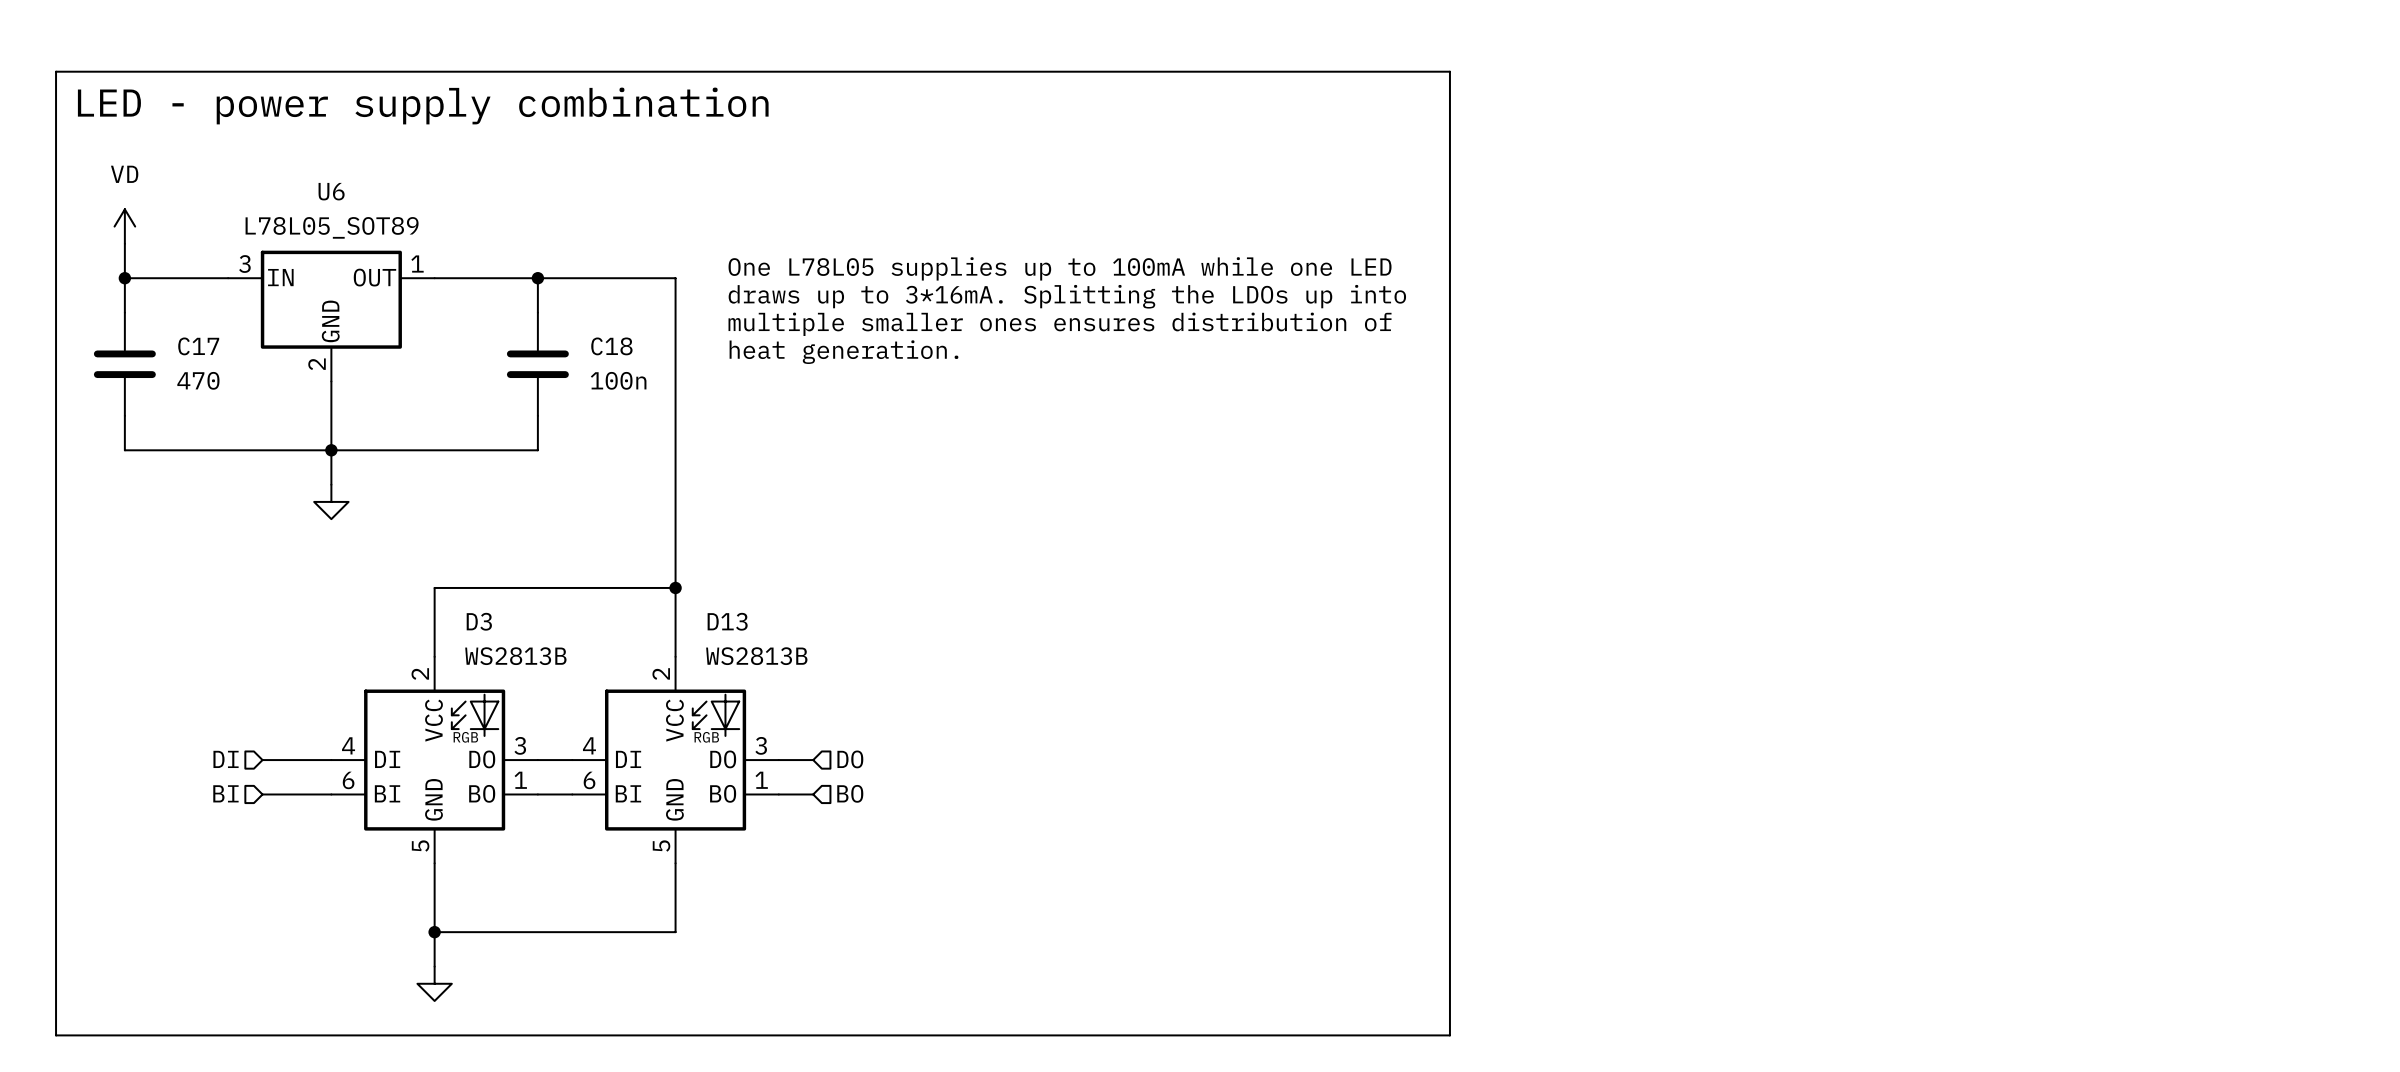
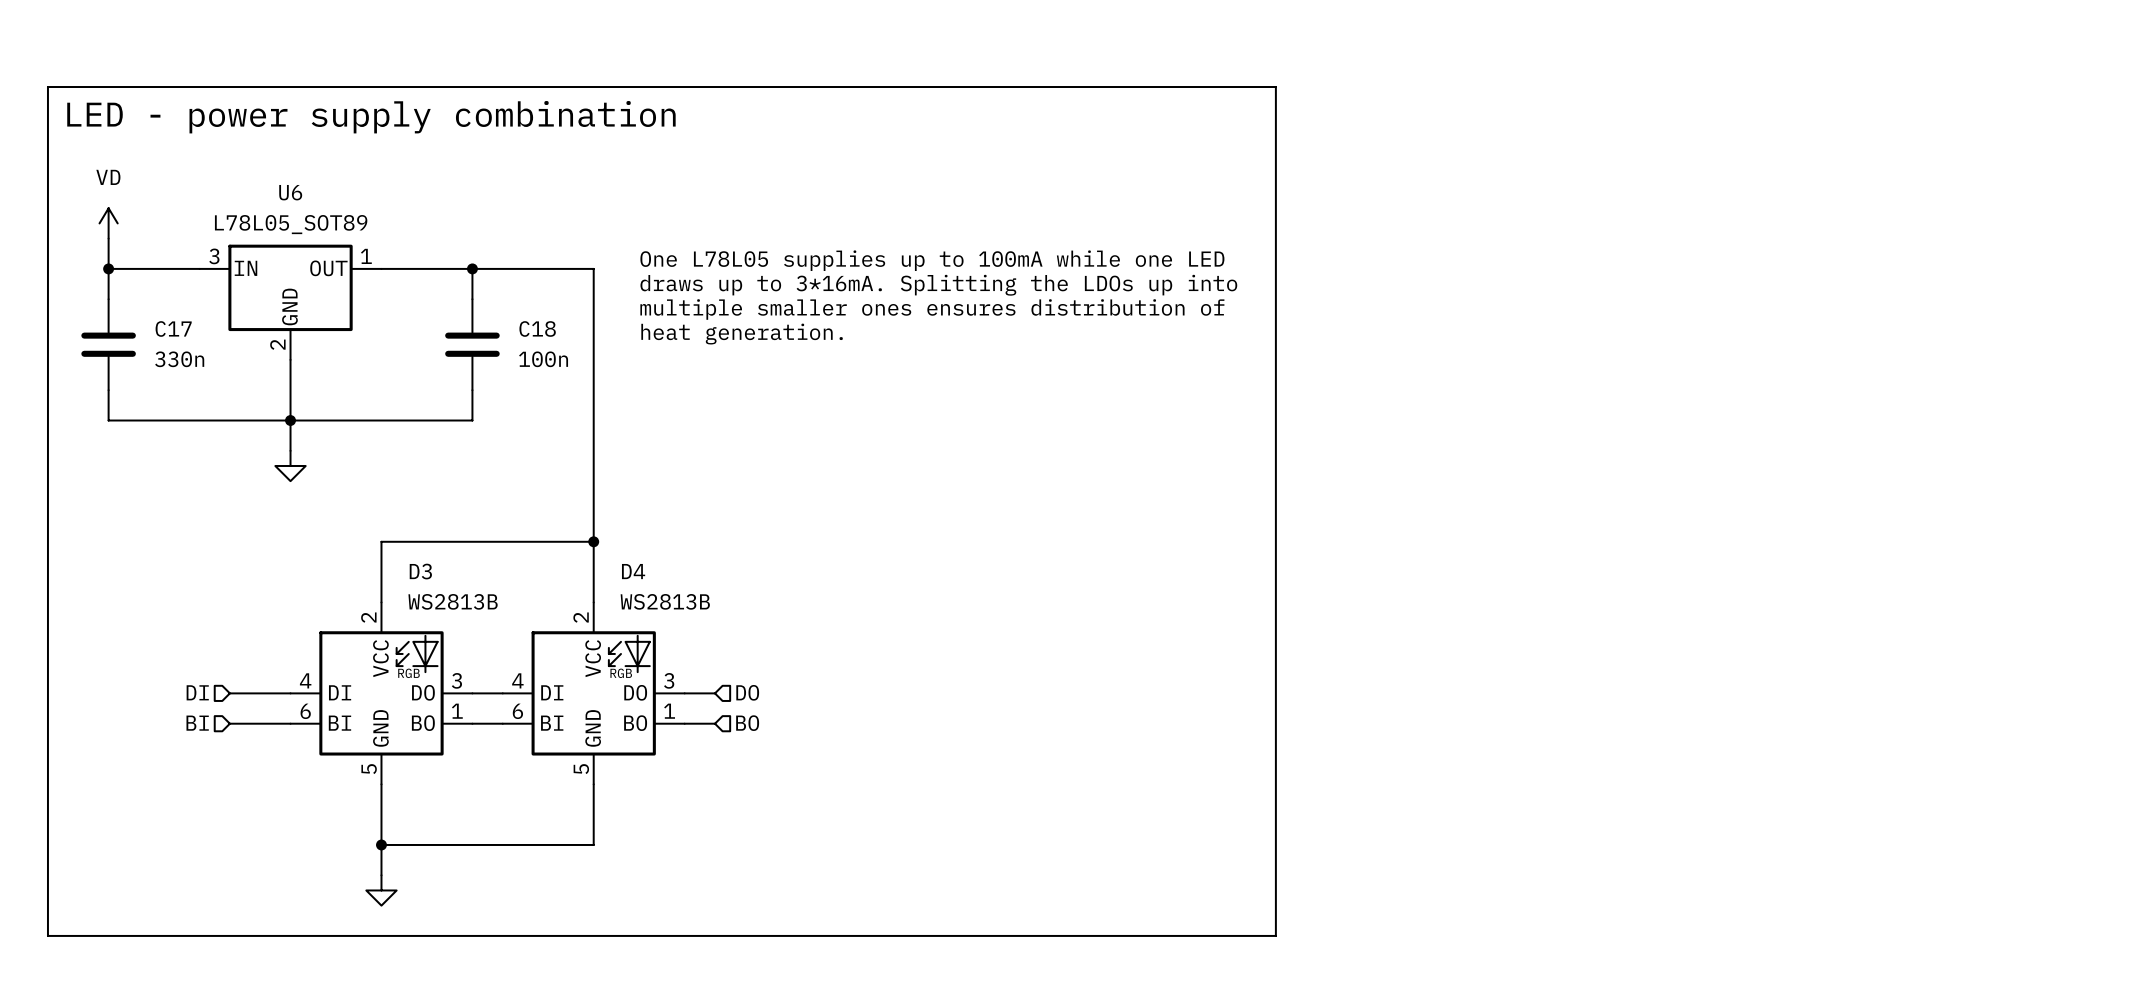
C17 value: 470 (198, 380) -> 330n (179, 359)
D13 name: D13 (727, 621) -> D4 (633, 571)

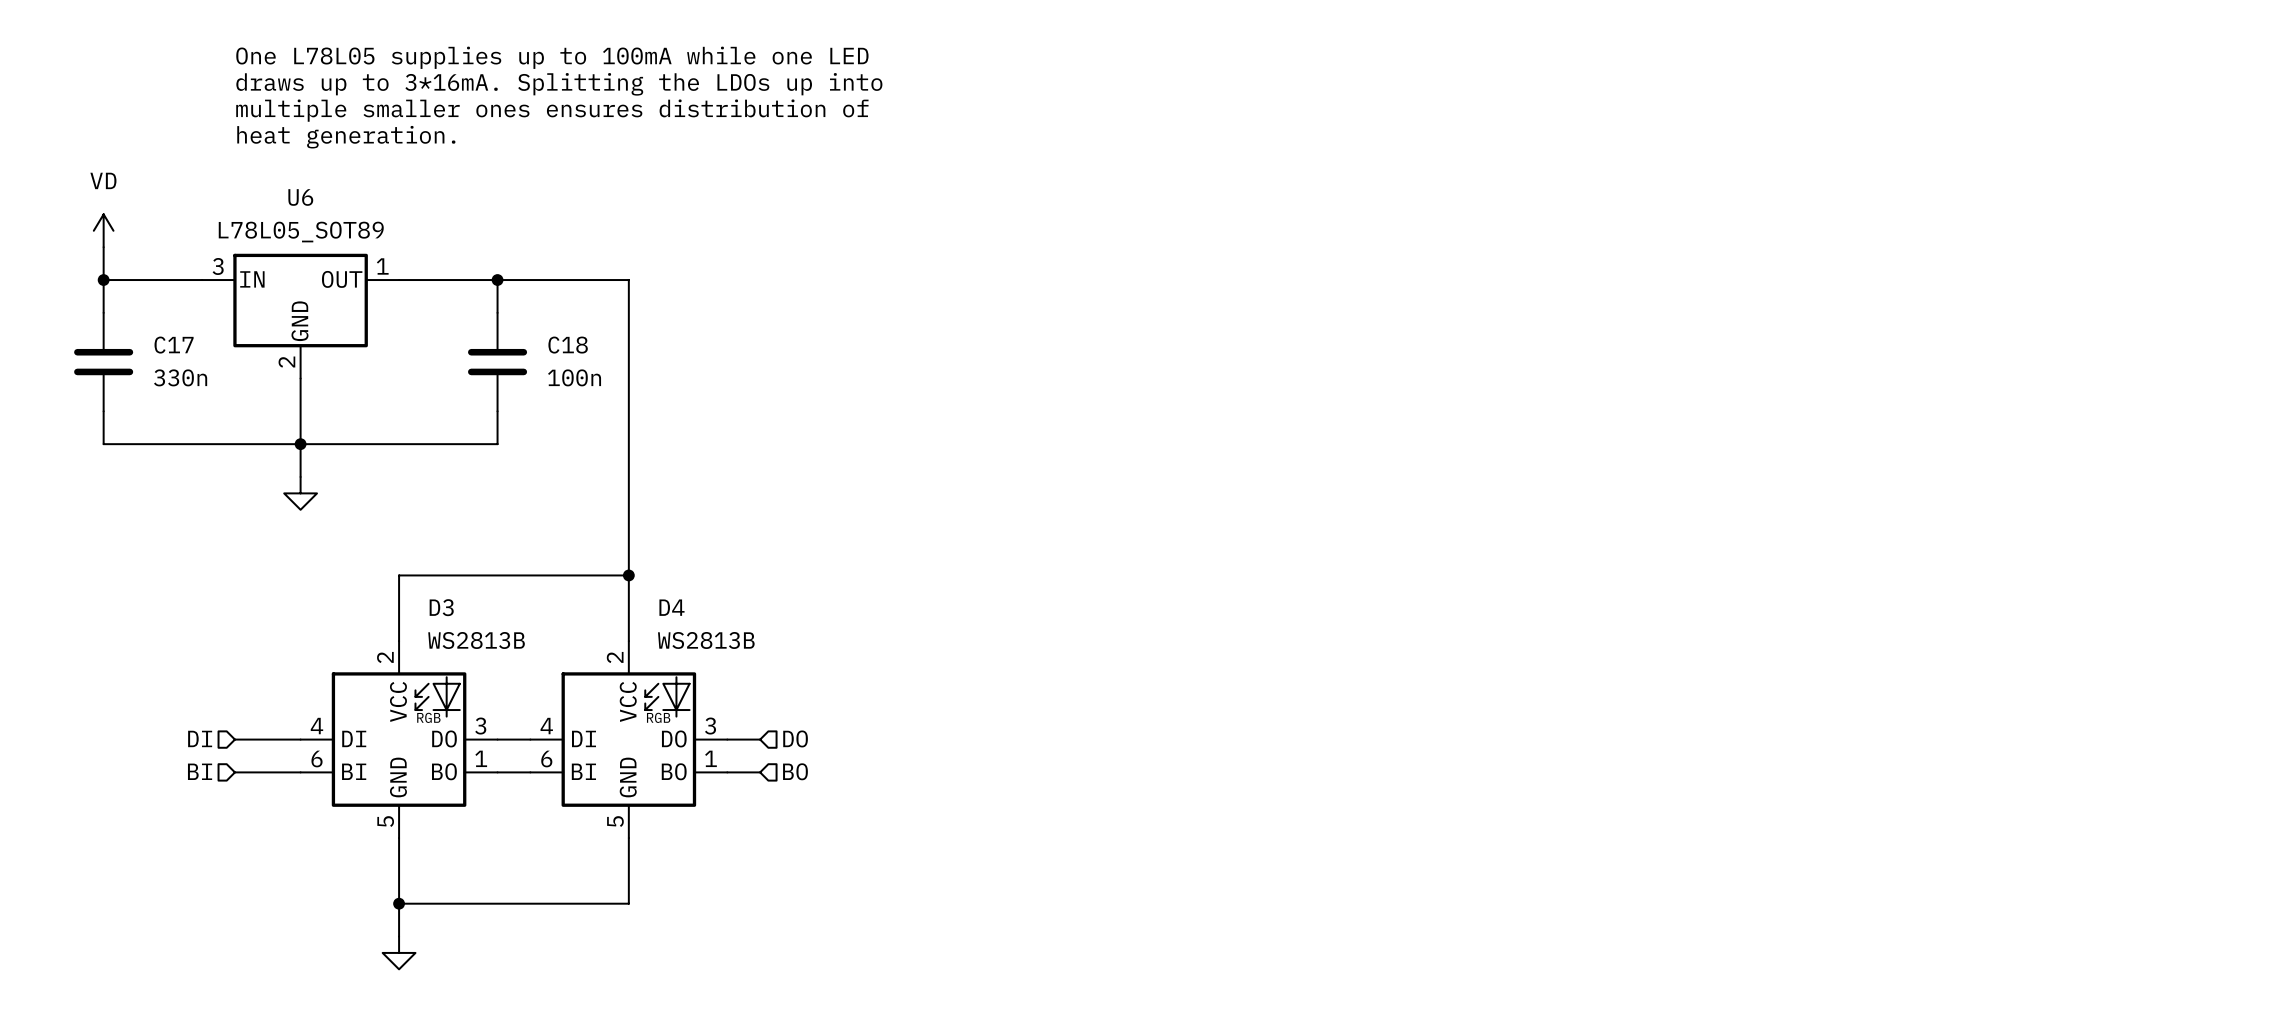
text: none -> One L78L05 supplies up to 100mA while one LED (552, 57)
line: (47, 87) (1275, 87) (1275, 935) (47, 935) (47, 87) -> none
text: none -> draws up to 3*16mA. Splitting the LDOs up into (559, 84)
text: none -> multiple smaller ones ensures distribution of (552, 110)
text: LED - power supply combination (371, 117) -> none
text: none -> heat generation. (346, 137)
text: One L78L05 supplies up to 100mA while one LED (932, 260) -> none
text: draws up to 3*16mA. Splitting the LDOs up into (938, 285) -> none
text: multiple smaller ones ensures distribution of (932, 309) -> none
text: heat generation. (742, 334) -> none

